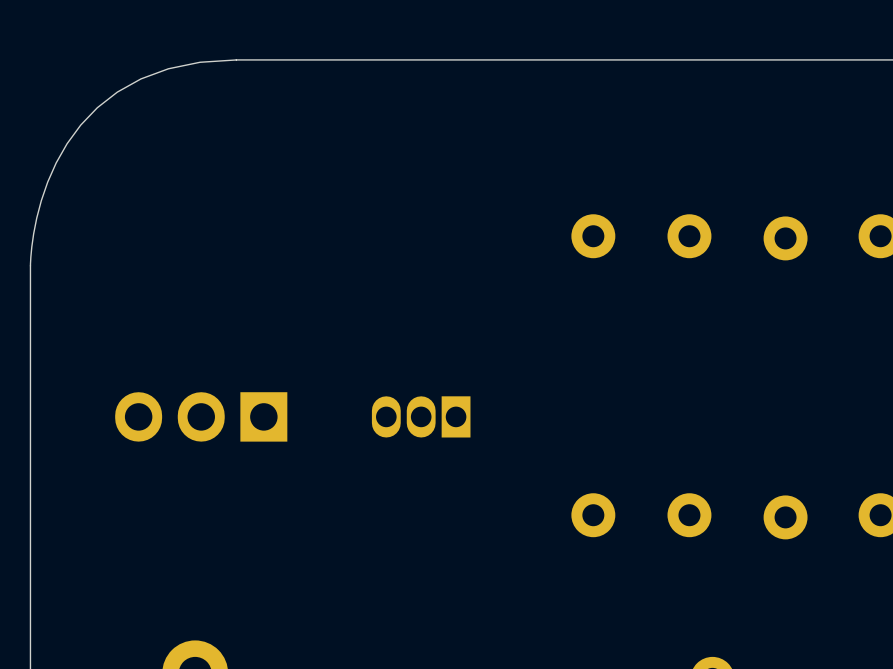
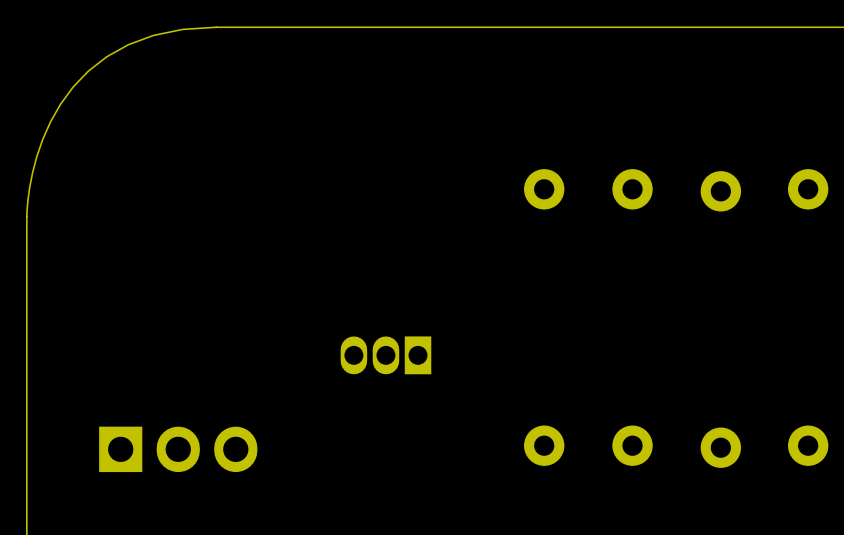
part rotation: 0° (201, 416) -> 180° (178, 449)

